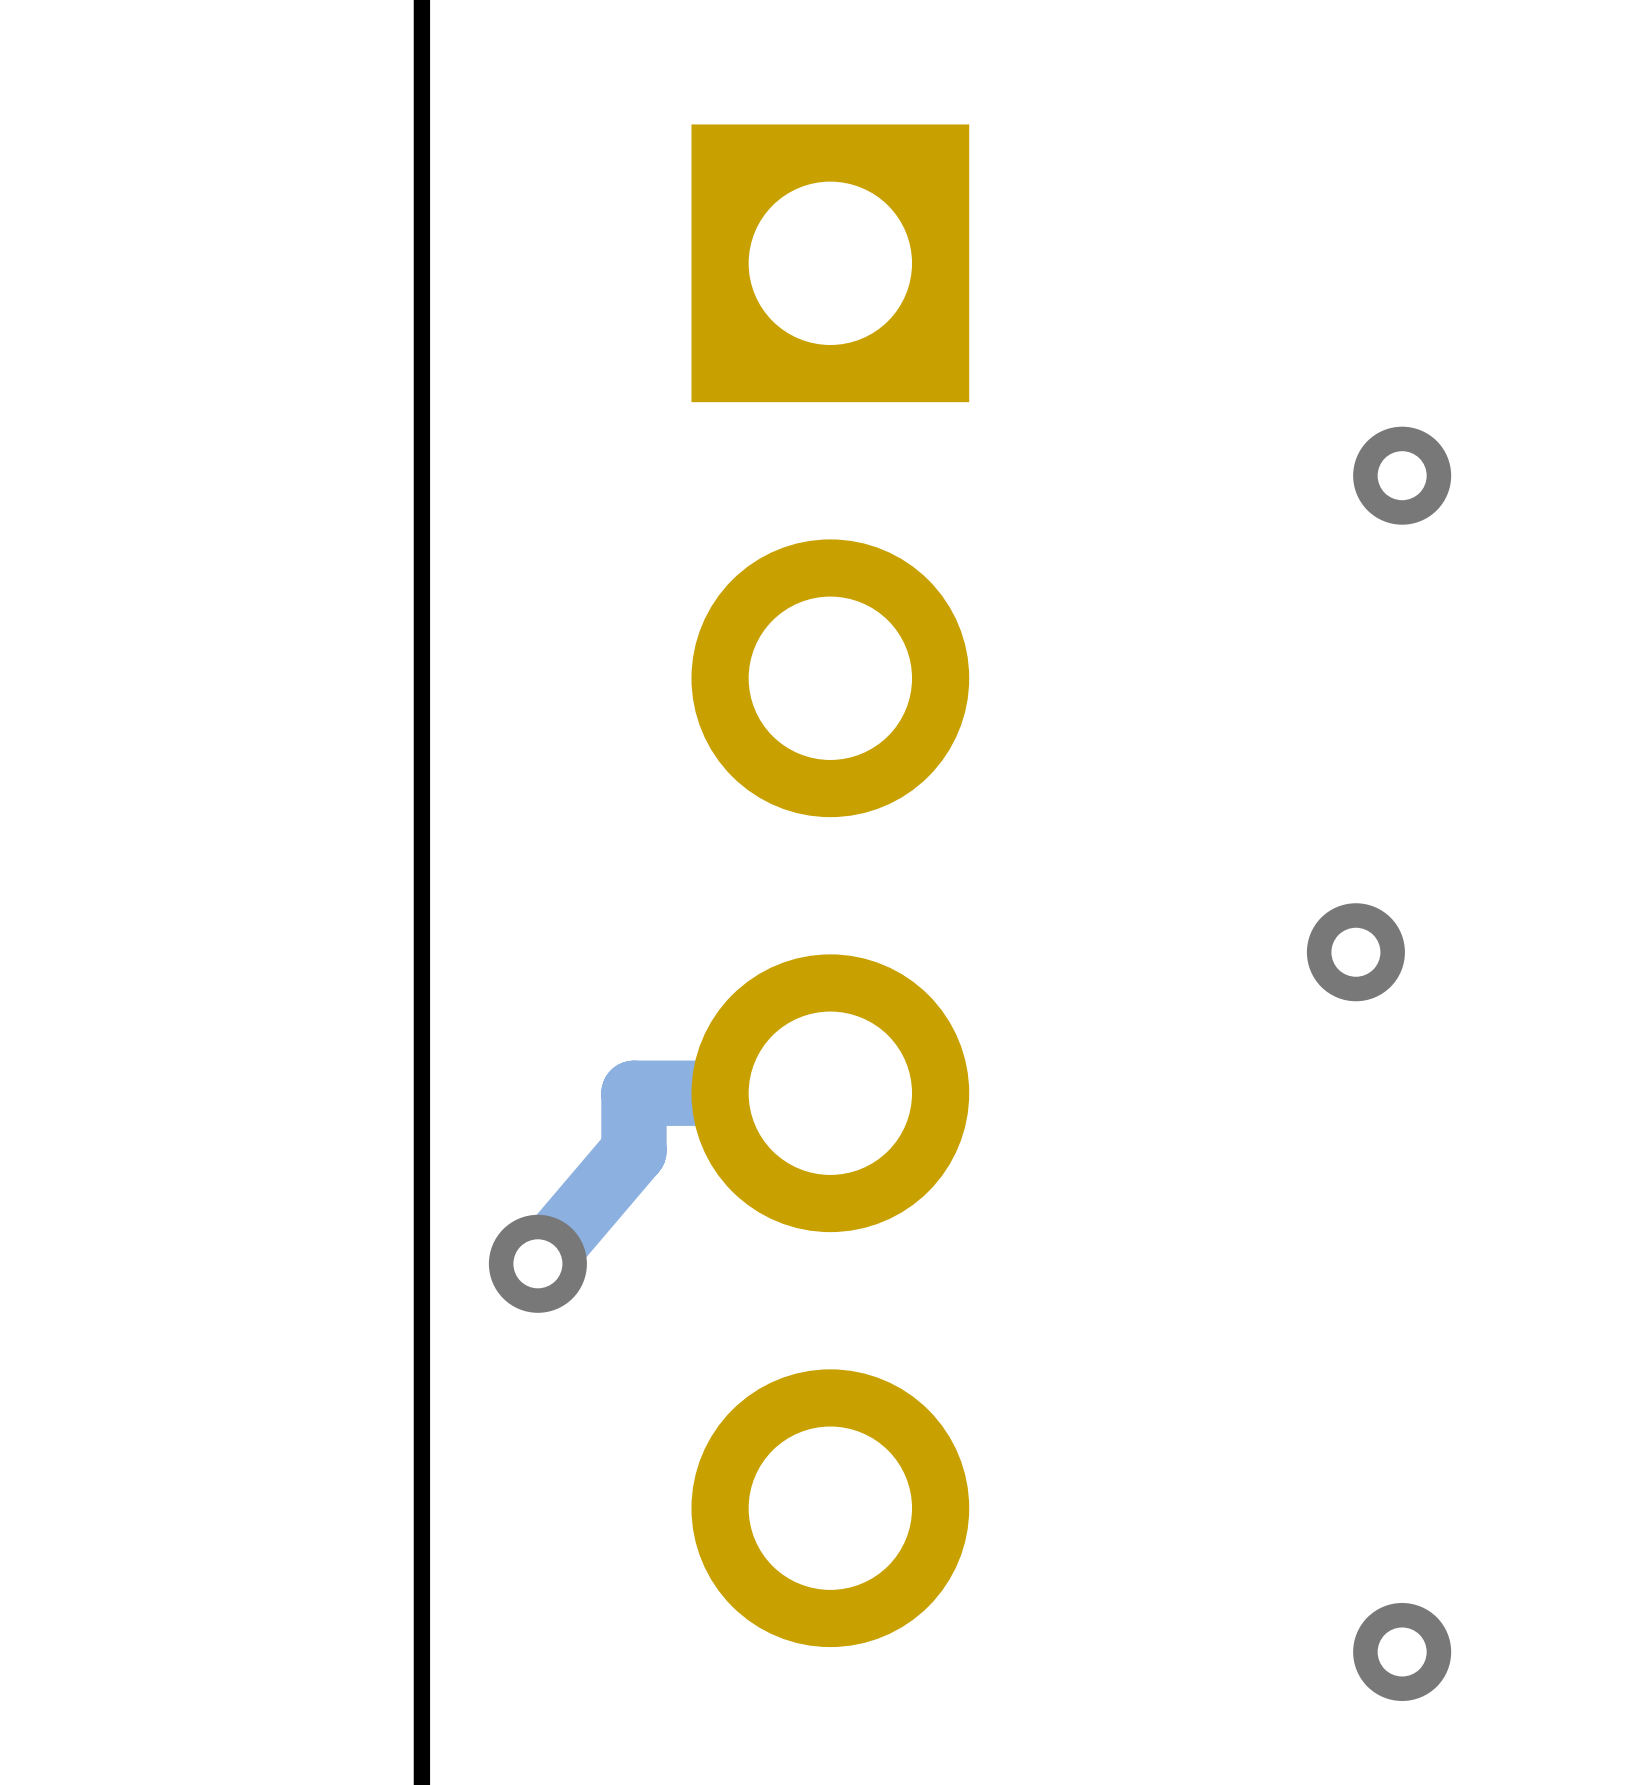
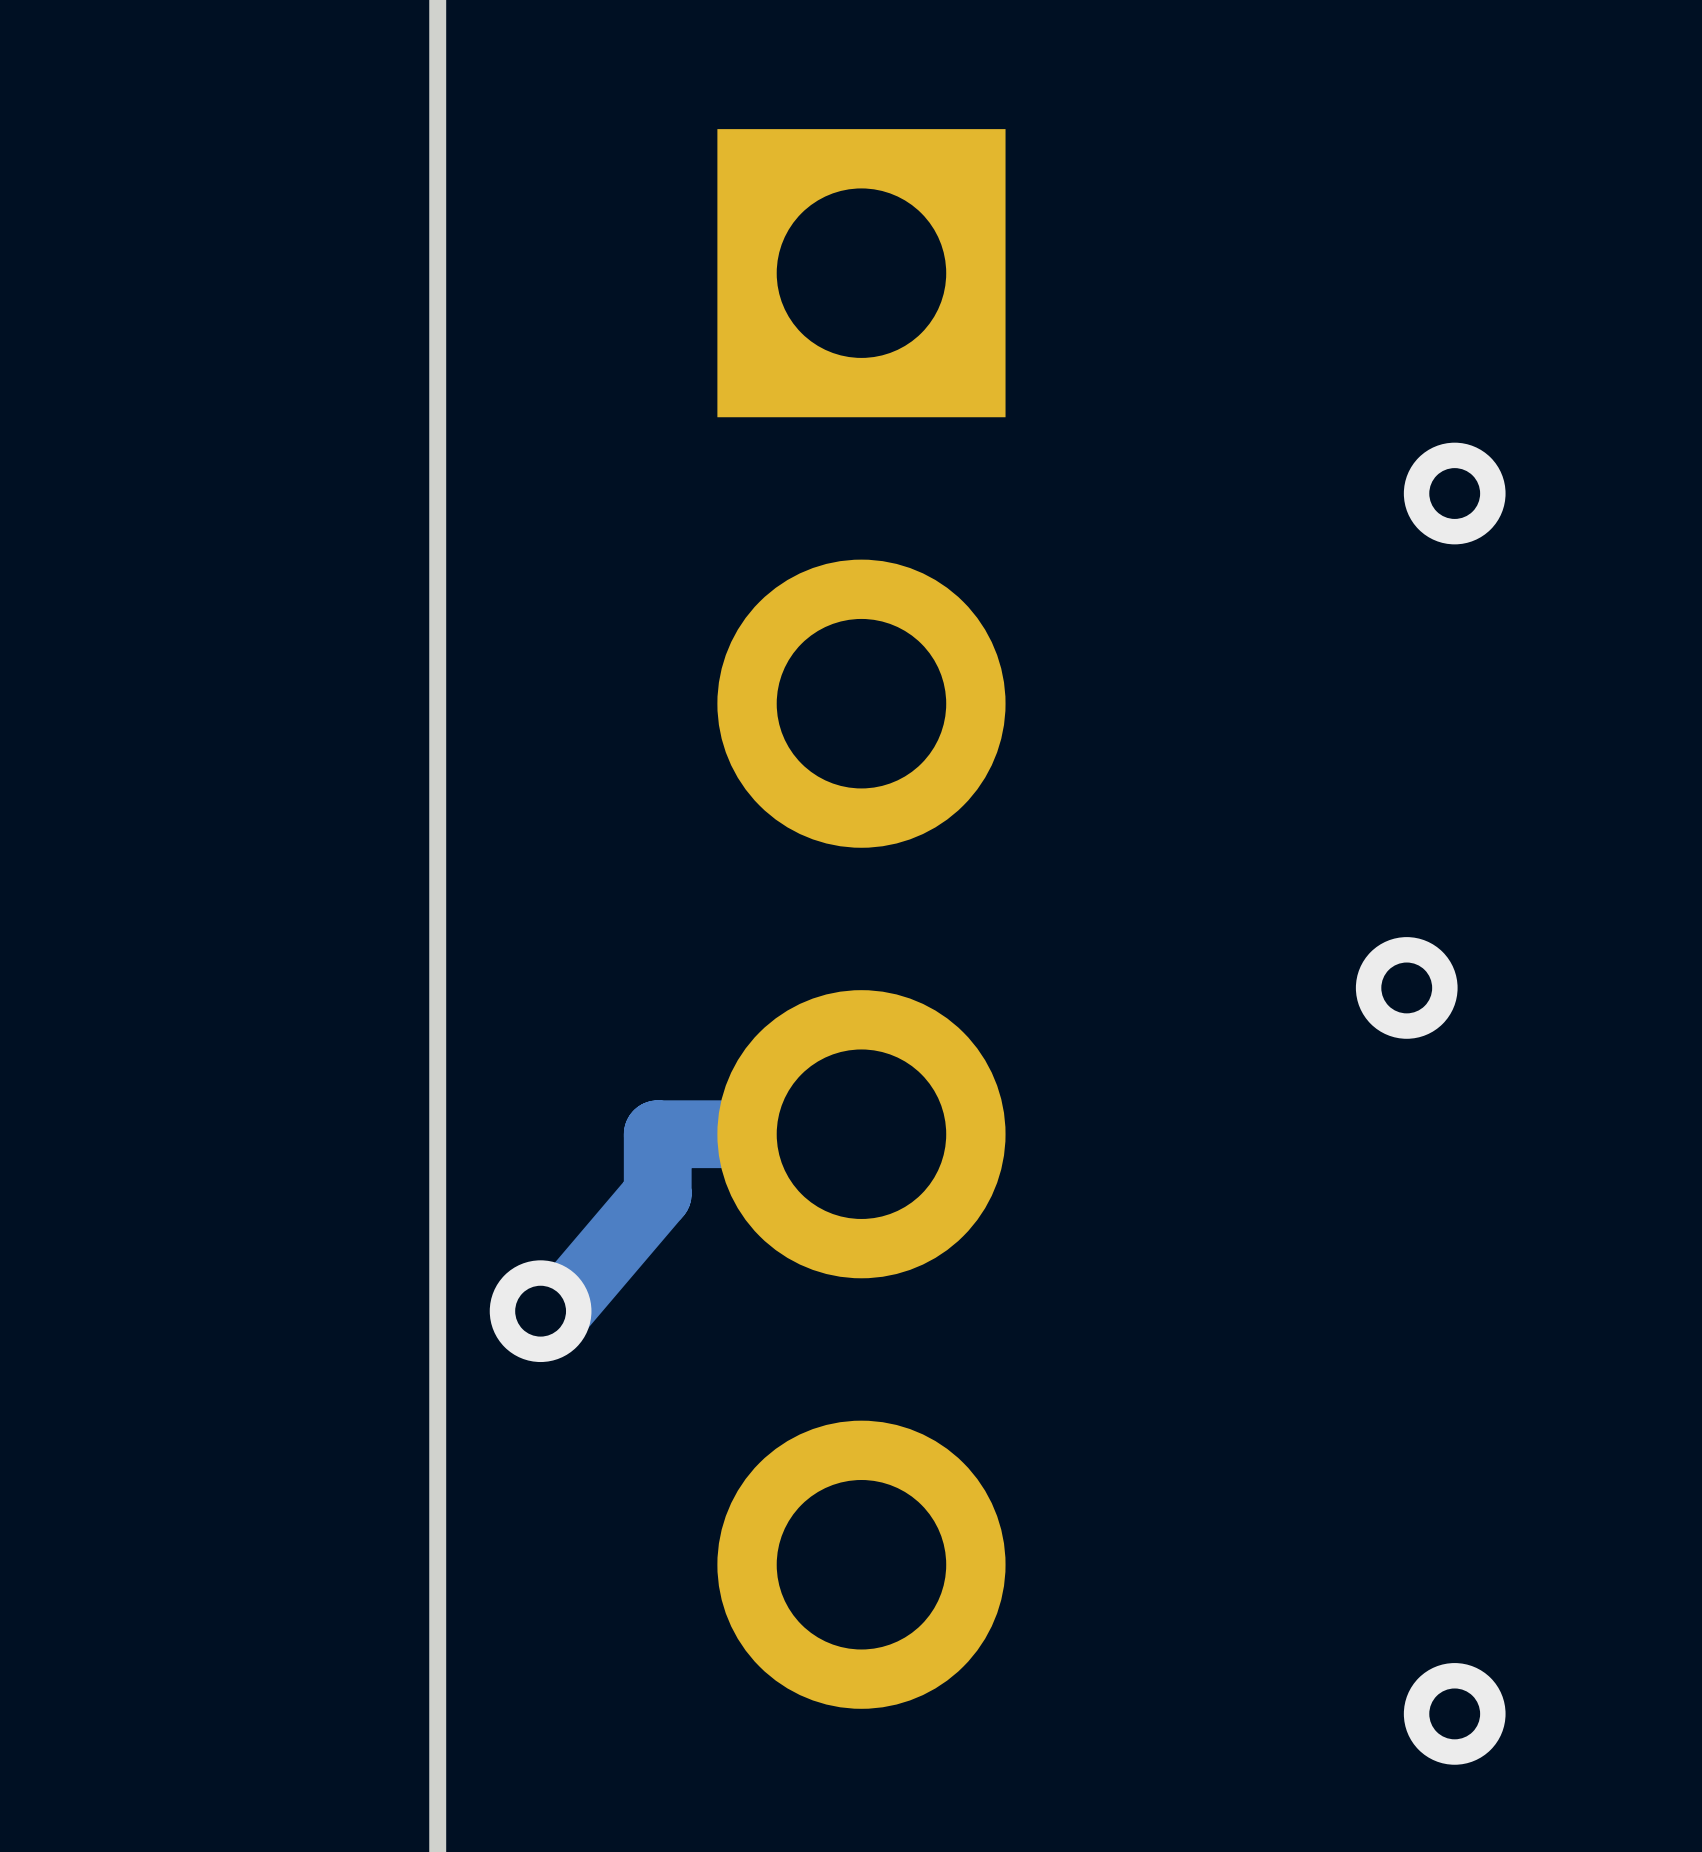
via position: (537, 1263) -> (540, 1311)

